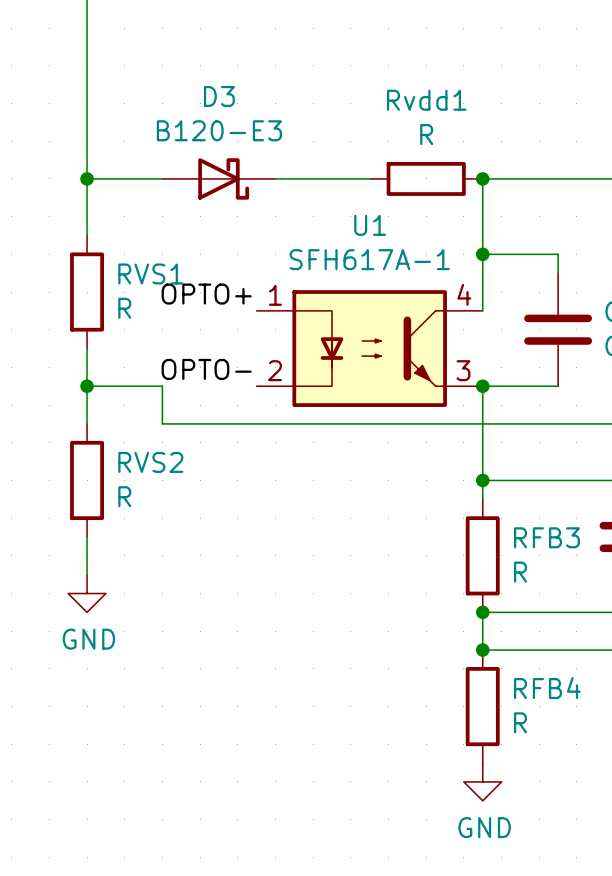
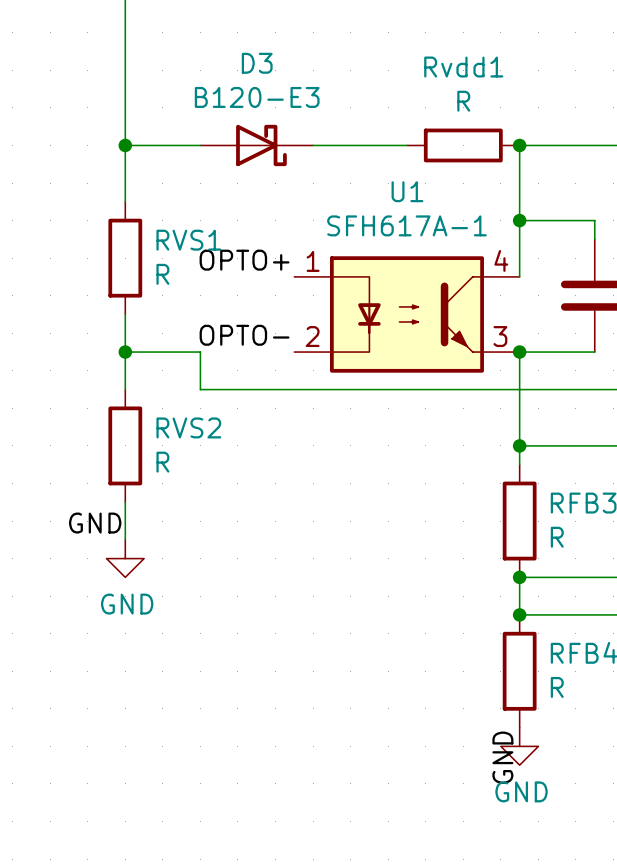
label: none -> GND (95, 523)
label: none -> GND (502, 757)

